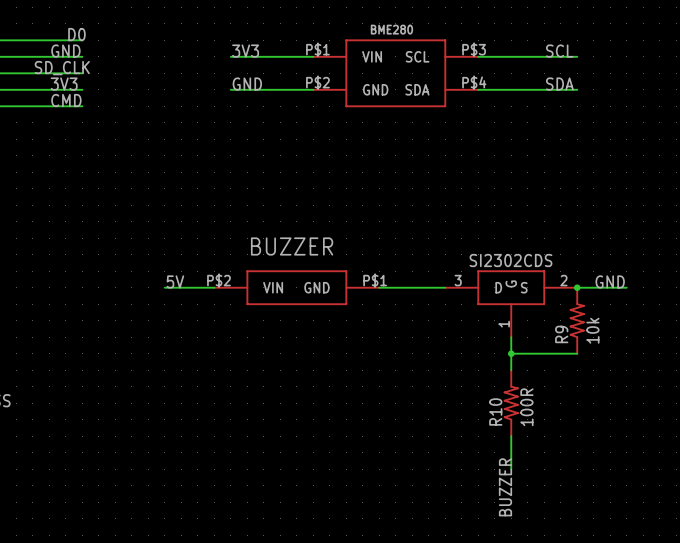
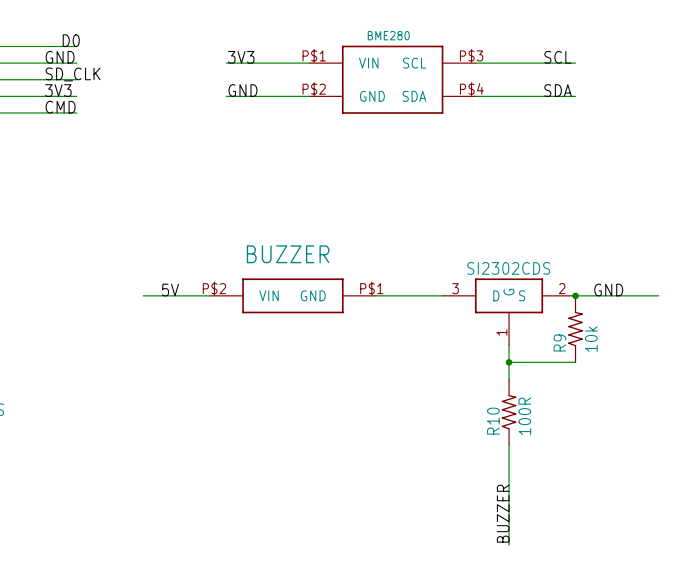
label position: SD_CLK (62, 68) -> SD_CLK (73, 74)
wire: none -> (143, 295) (159, 295)
wire: none -> (625, 295) (658, 295)
wire: none -> (509, 478) (509, 545)
label position: BUZZER (505, 487) -> BUZZER (503, 513)

